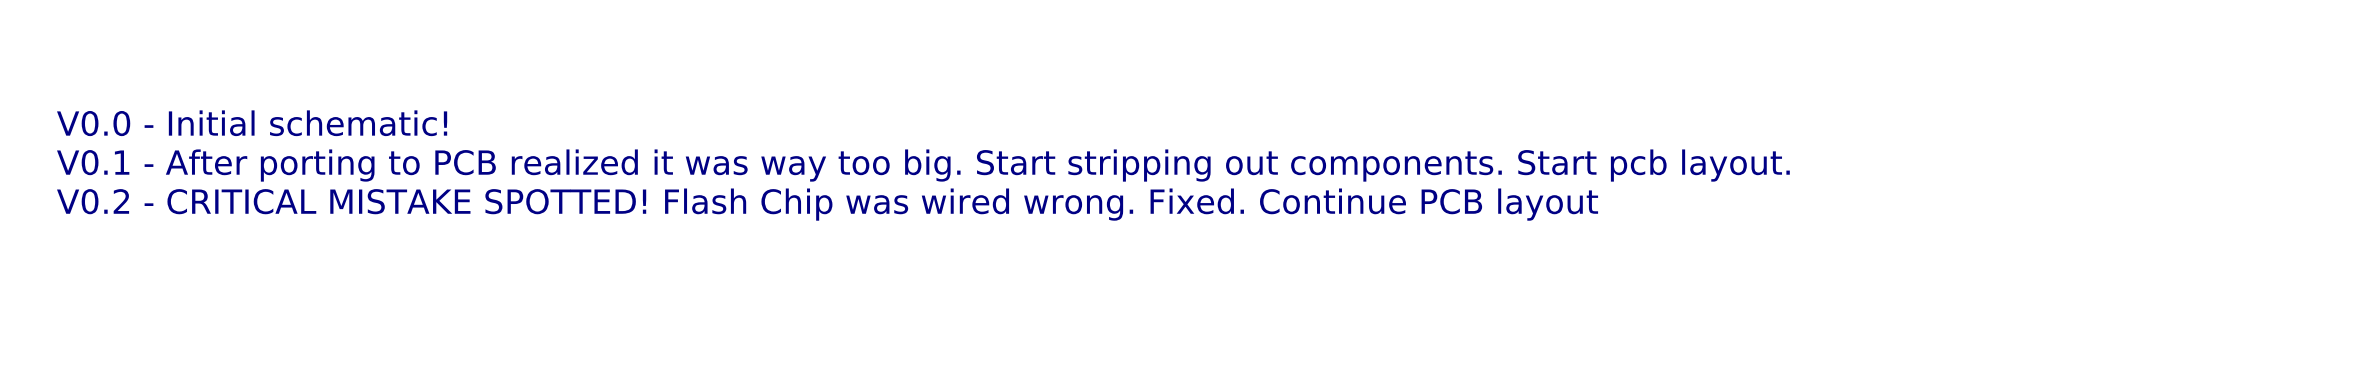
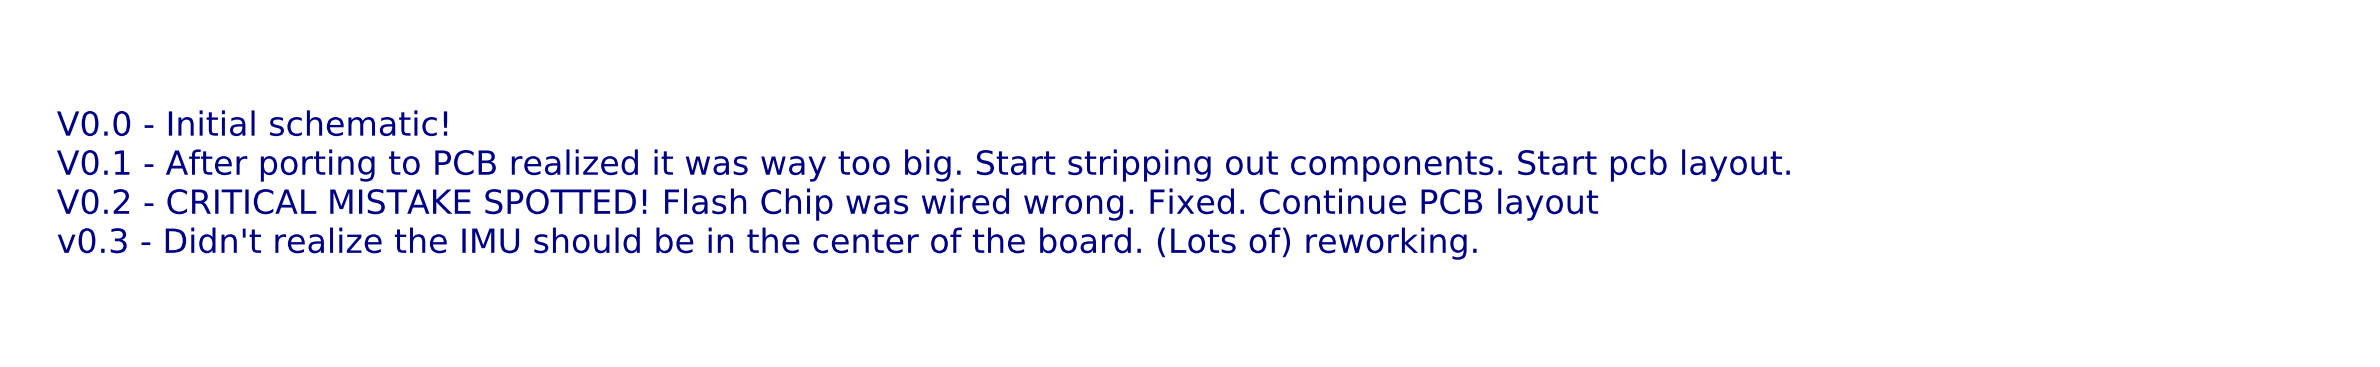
text: none -> v0.3 - Didn't realize the IMU should be in the center of the board. (Lots of) reworking. (767, 243)

